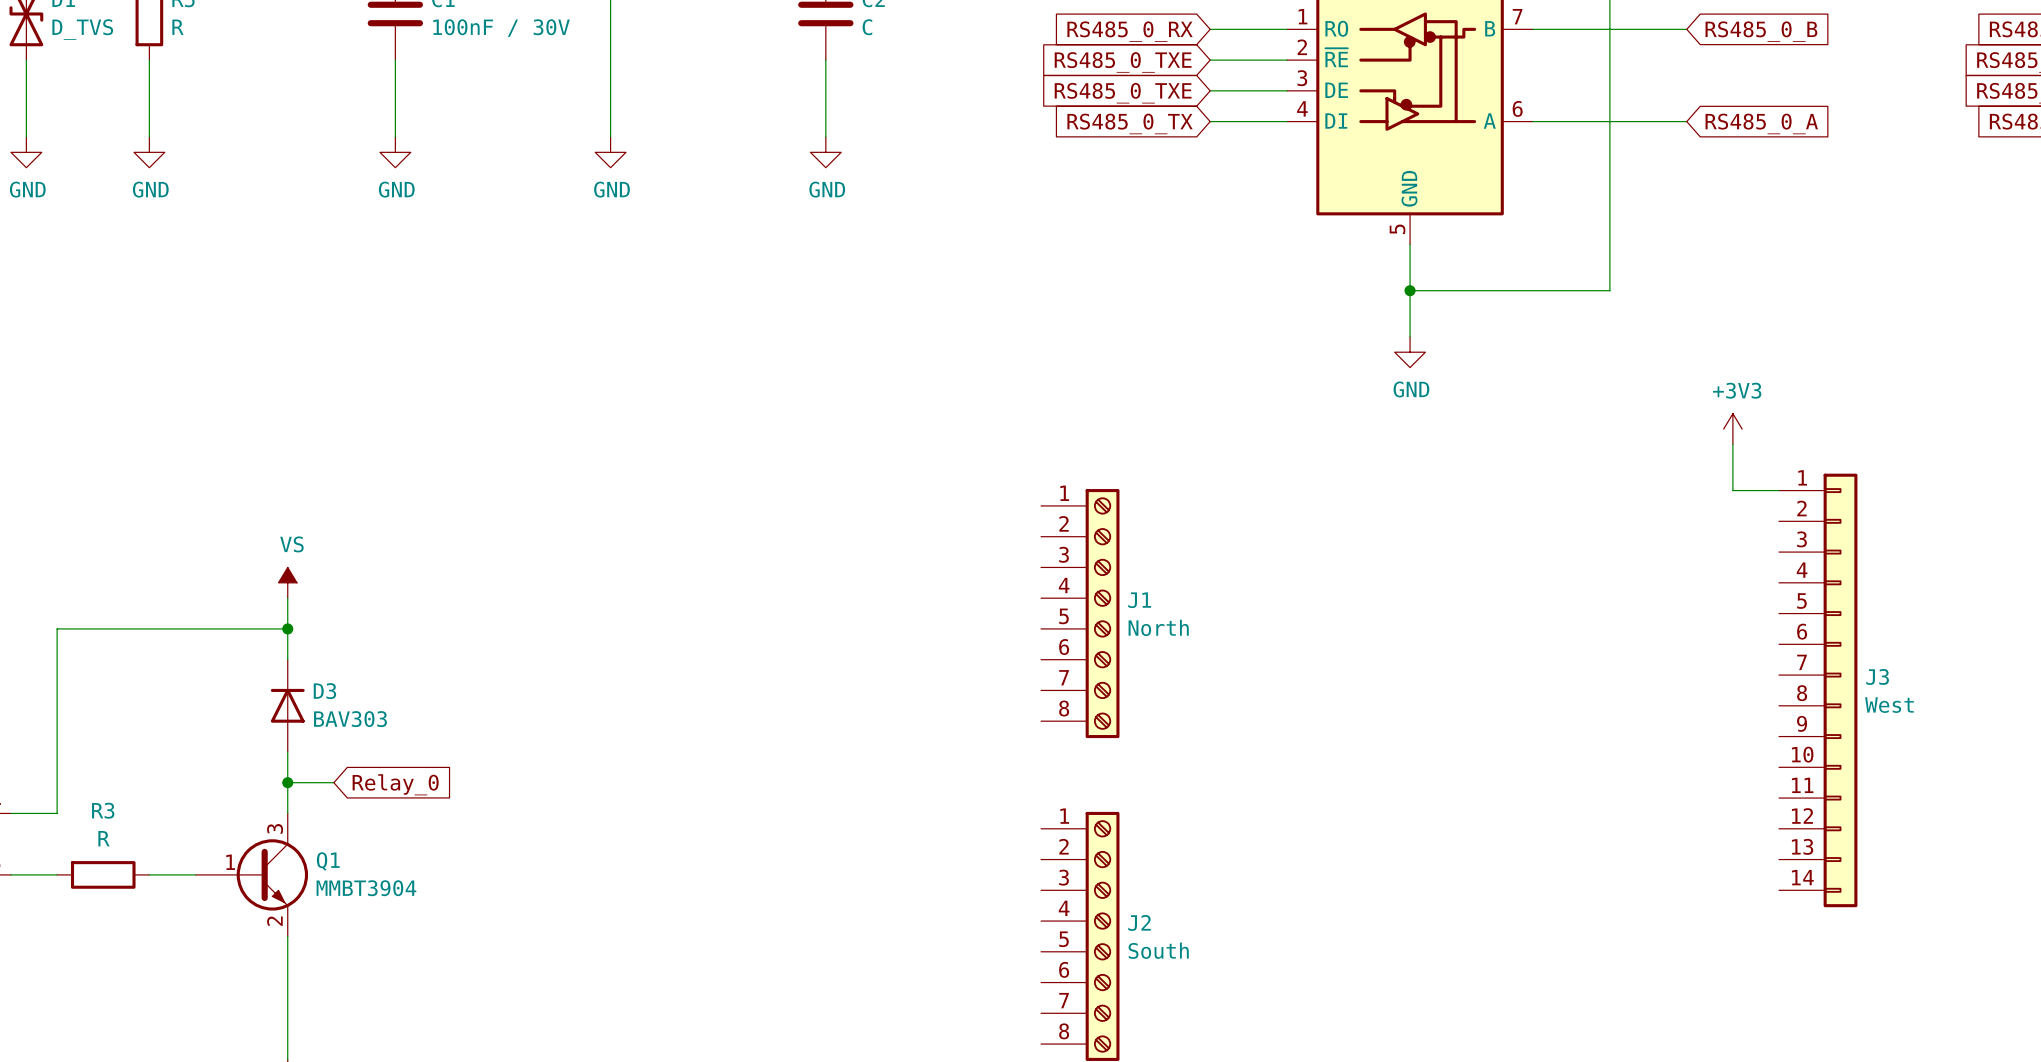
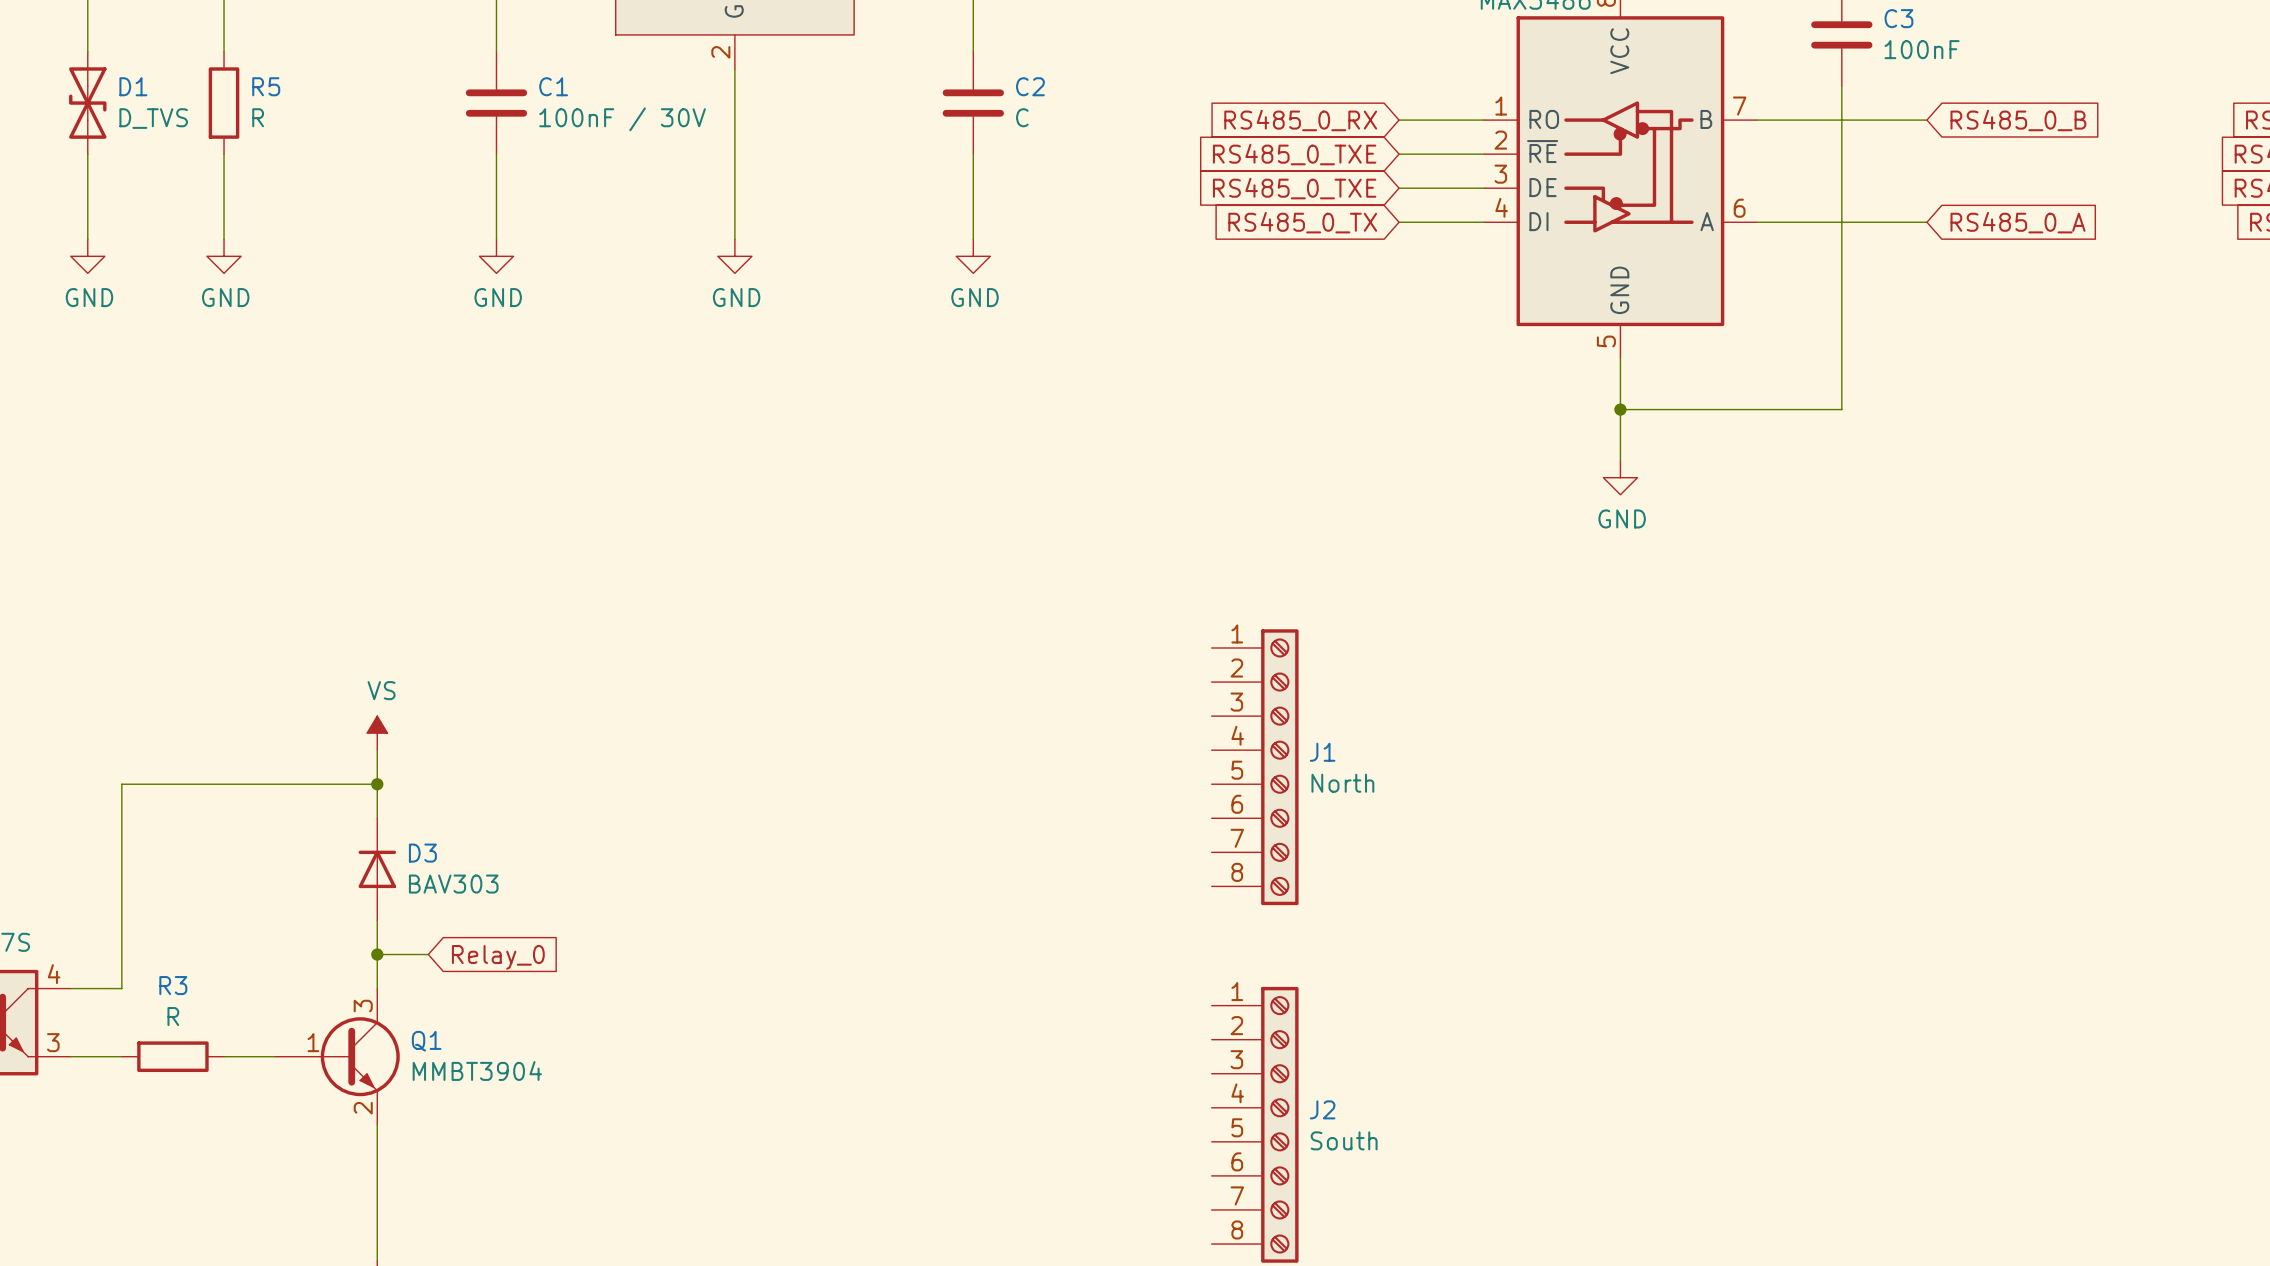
power symbol: +3V3 (1732, 429) -> none
wire: (1732, 444) (1732, 490) (1779, 490) -> none
J3: West (1818, 690) -> none

